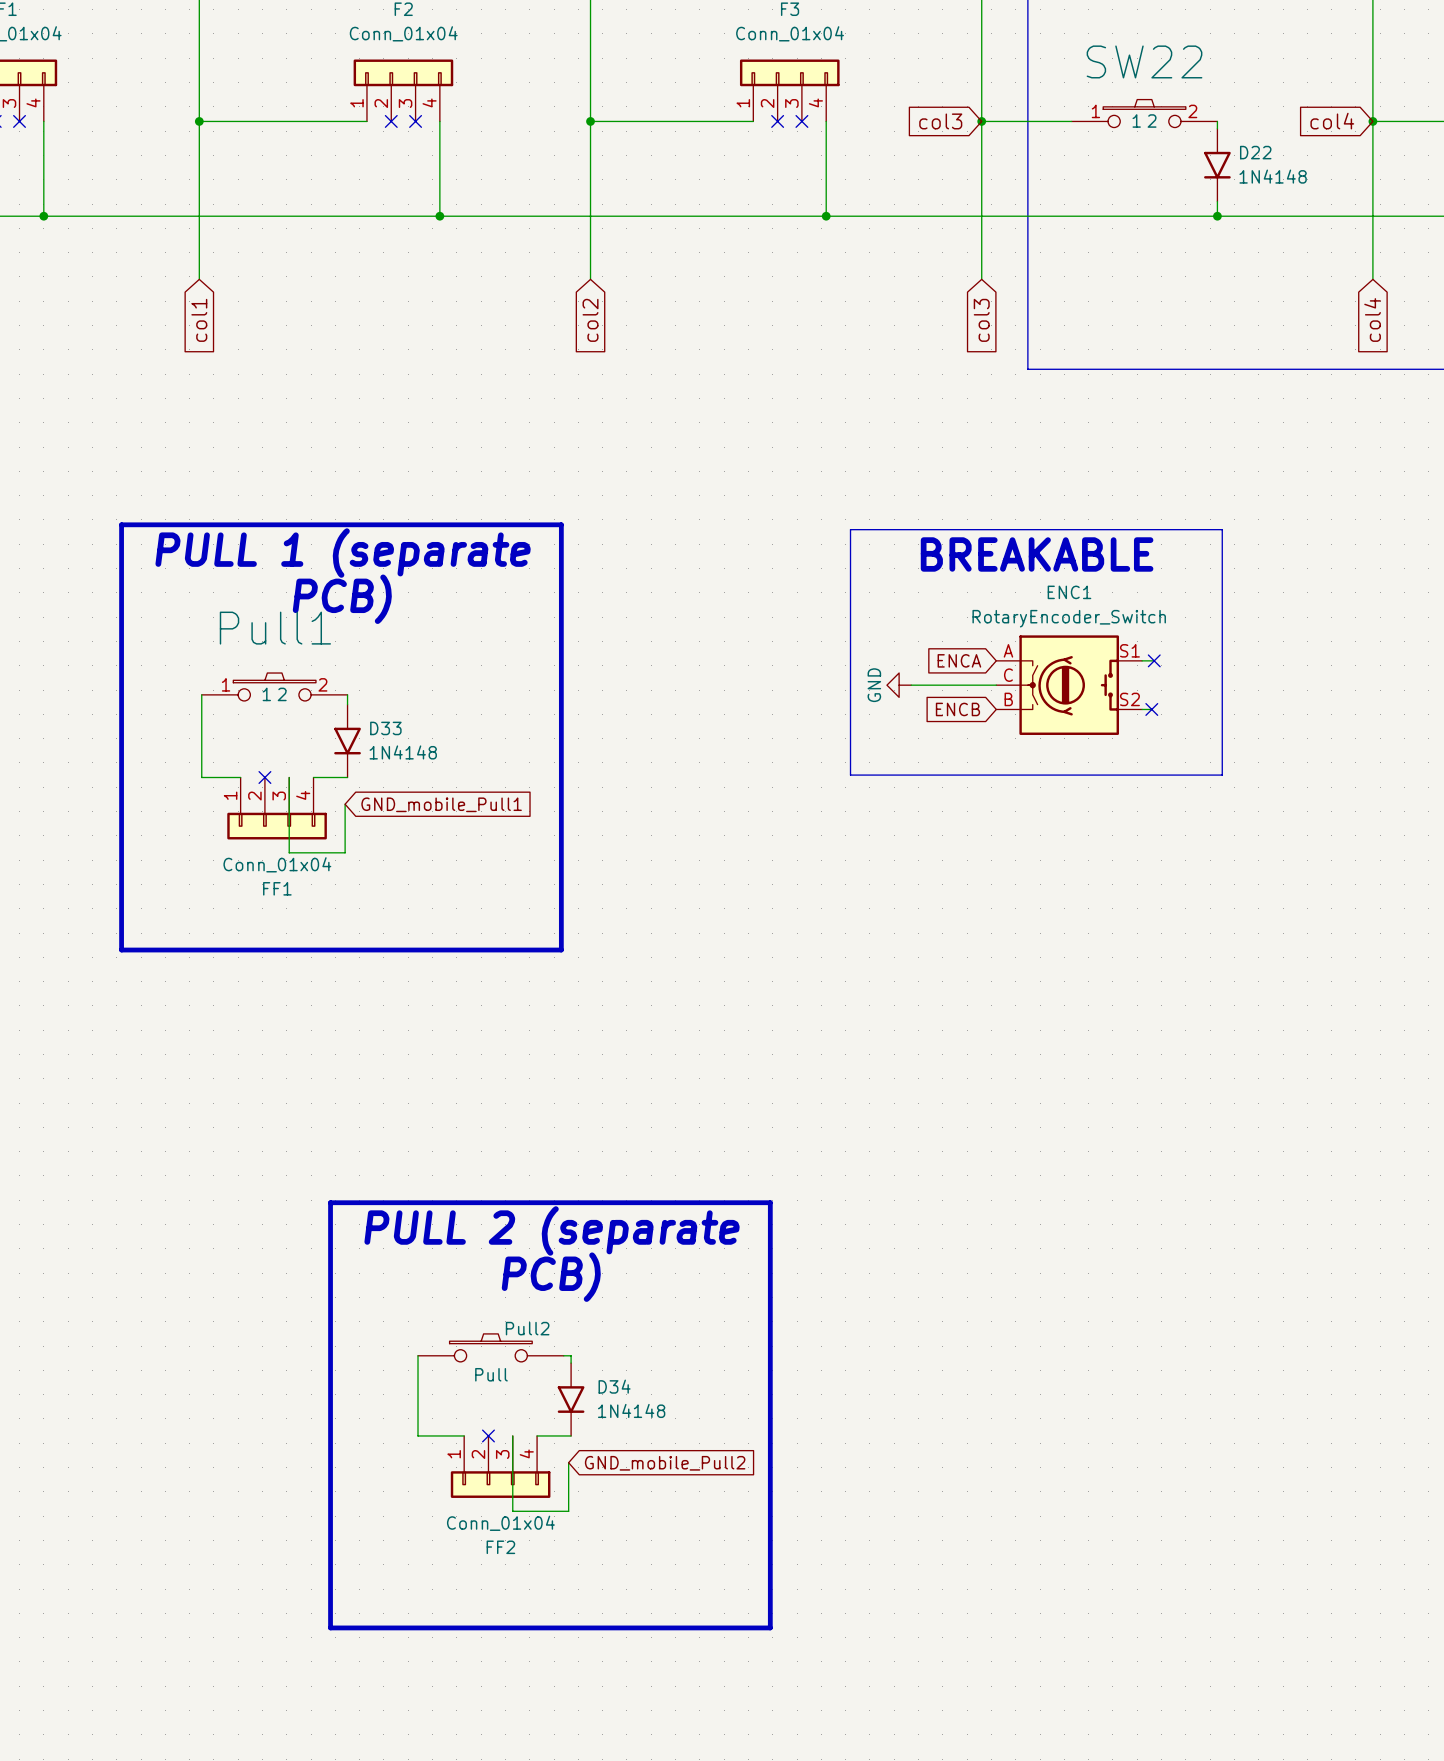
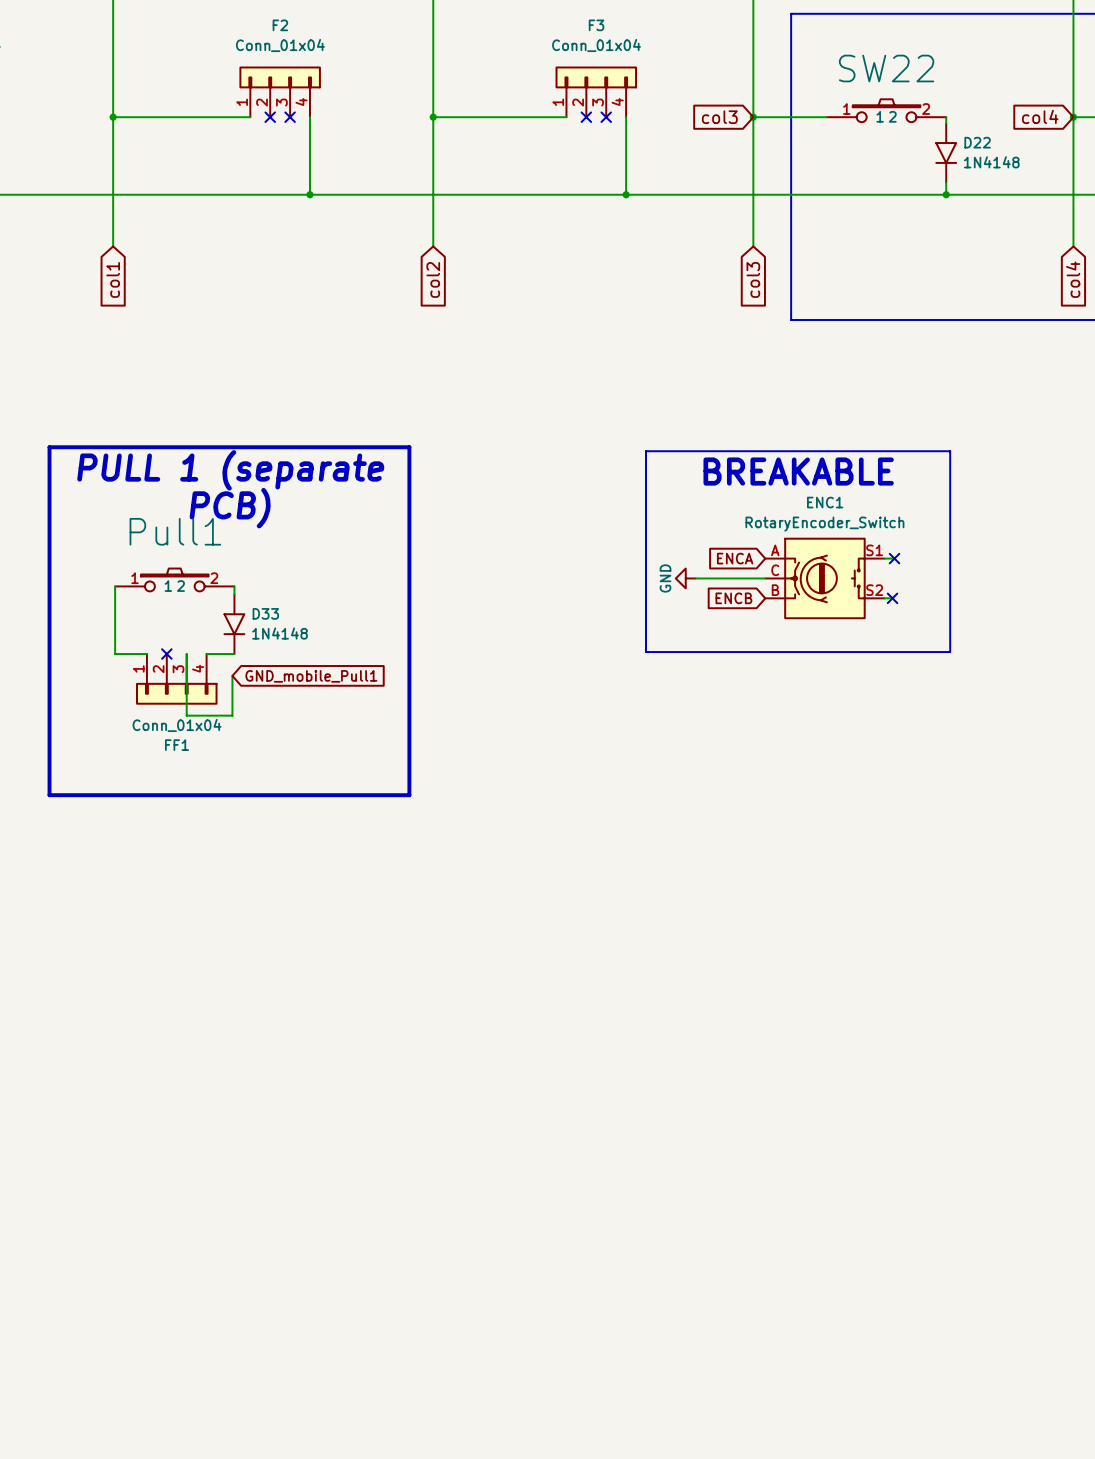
line: (330, 1202) (770, 1202) (770, 1627) (330, 1627) (330, 1202) -> none
text: PULL 2 (separate (552, 1230) -> none
text: PCB) (551, 1277) -> none
Pull2: Pull (490, 1347) -> none
wire: (418, 1355) (418, 1435) (464, 1435) -> none
wire: (563, 1355) (571, 1355) (571, 1363) -> none
D34: 1N4148 (571, 1399) -> none
no-connect mark: (488, 1435) -> none
wire: (512, 1435) (512, 1511) (568, 1511) (568, 1462) -> none
wire: (537, 1435) (571, 1435) -> none
global label: GND_mobile_Pull2 (665, 1463) -> none
FF2: Conn_01x04 (500, 1466) -> none

